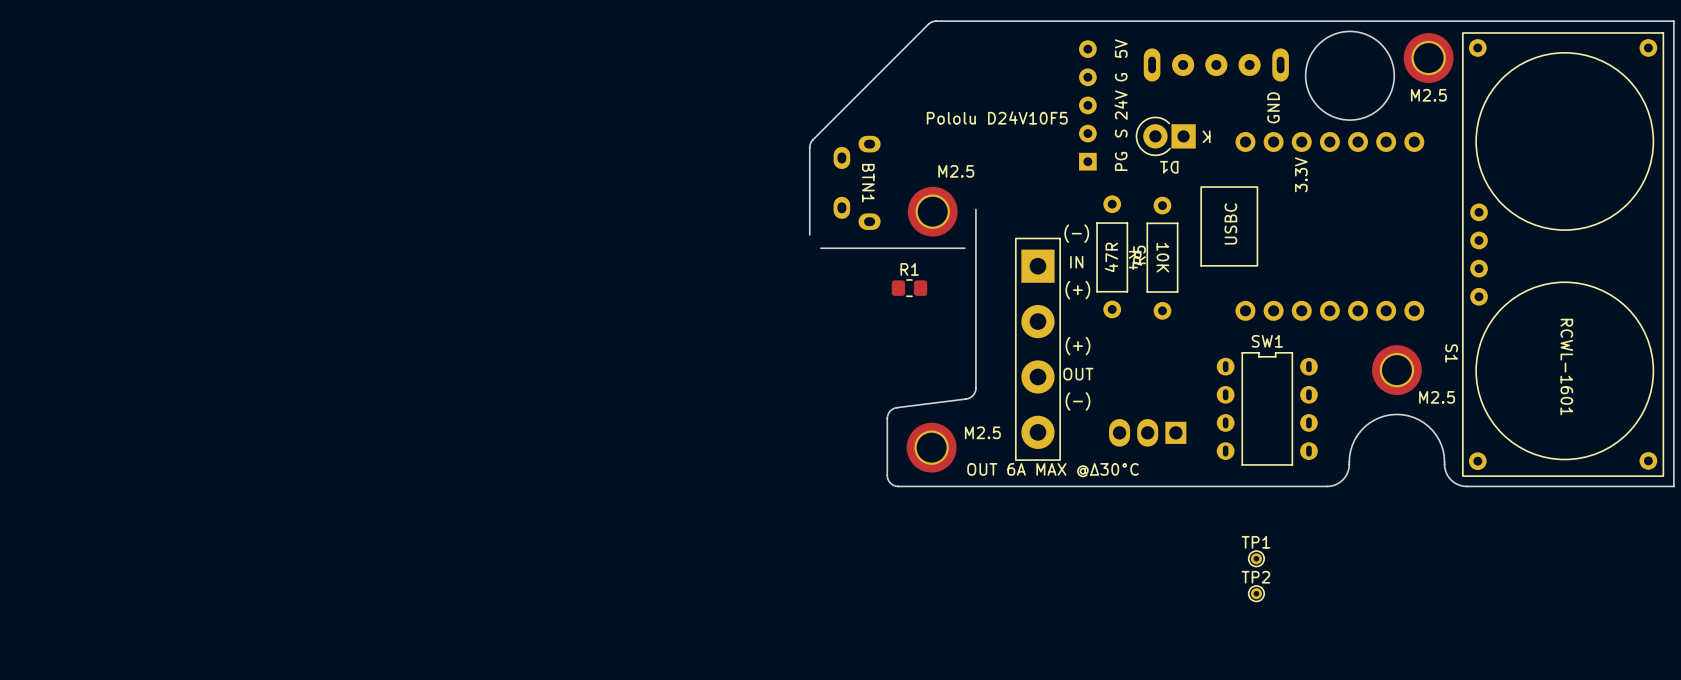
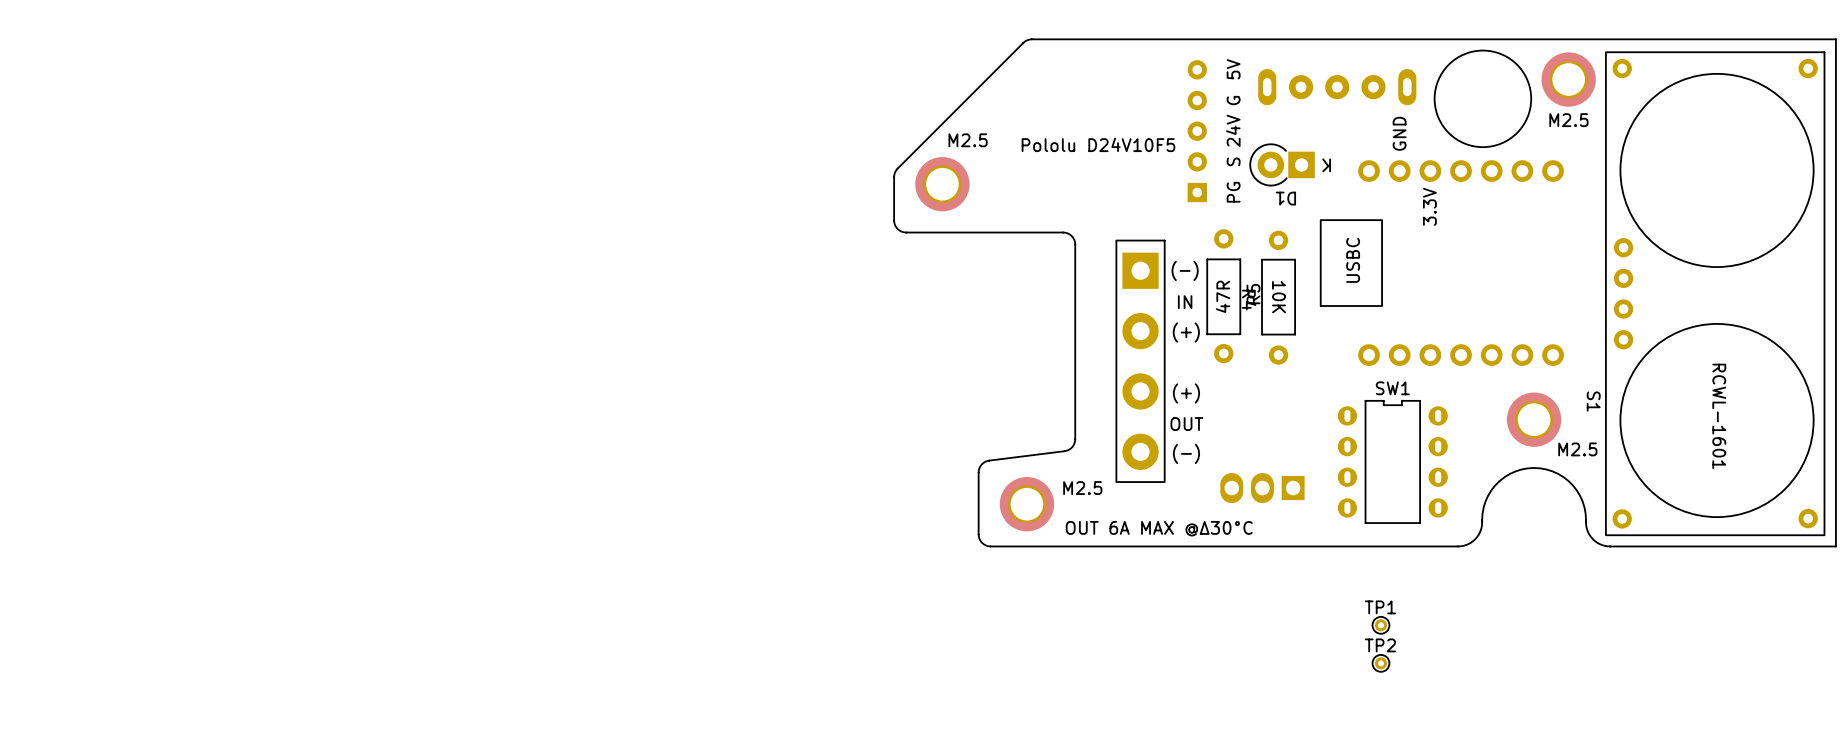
BTN1: (857, 182) -> none
board edge: (809, 187) (809, 234) -> (894, 220) (897, 228) (904, 232) (1064, 232) (1072, 237) (1075, 244)
M2.5 position: (932, 211) -> (942, 184)
board edge: (820, 248) (964, 248) -> none
R1: (909, 288) -> none
part position: (1037, 349) -> (1140, 361)

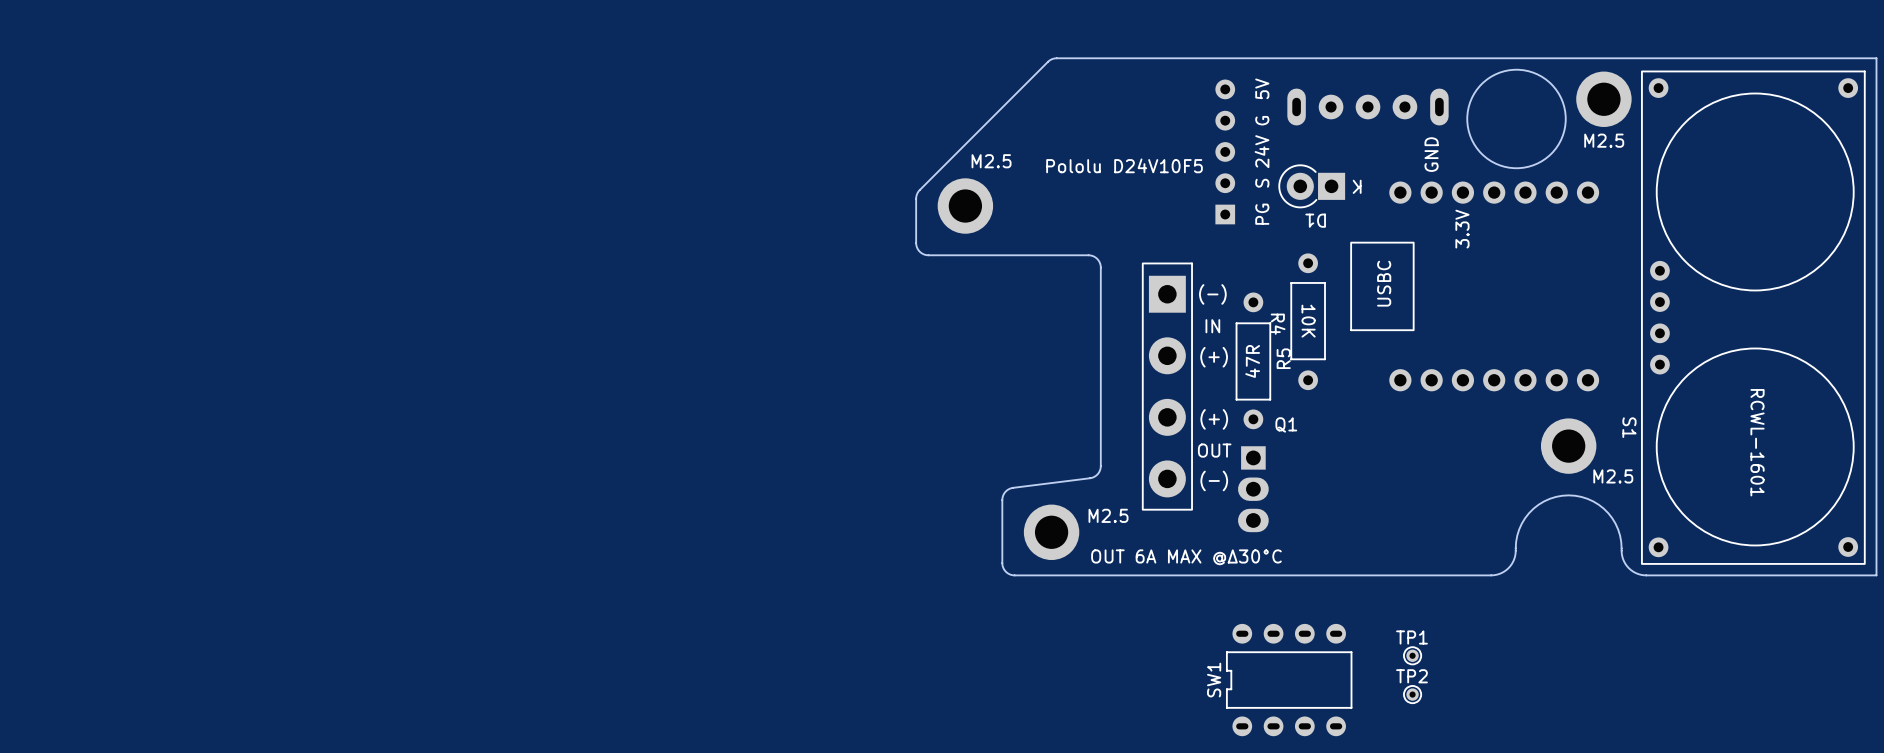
R5 position: (1223, 296) -> (1253, 360)
SW1 rotation: 0° (1392, 461) -> 90° counterclockwise (1289, 680)
SW1 position: (1392, 461) -> (1289, 680)
Q1 side: bottom (1262, 488) -> top (1253, 489)

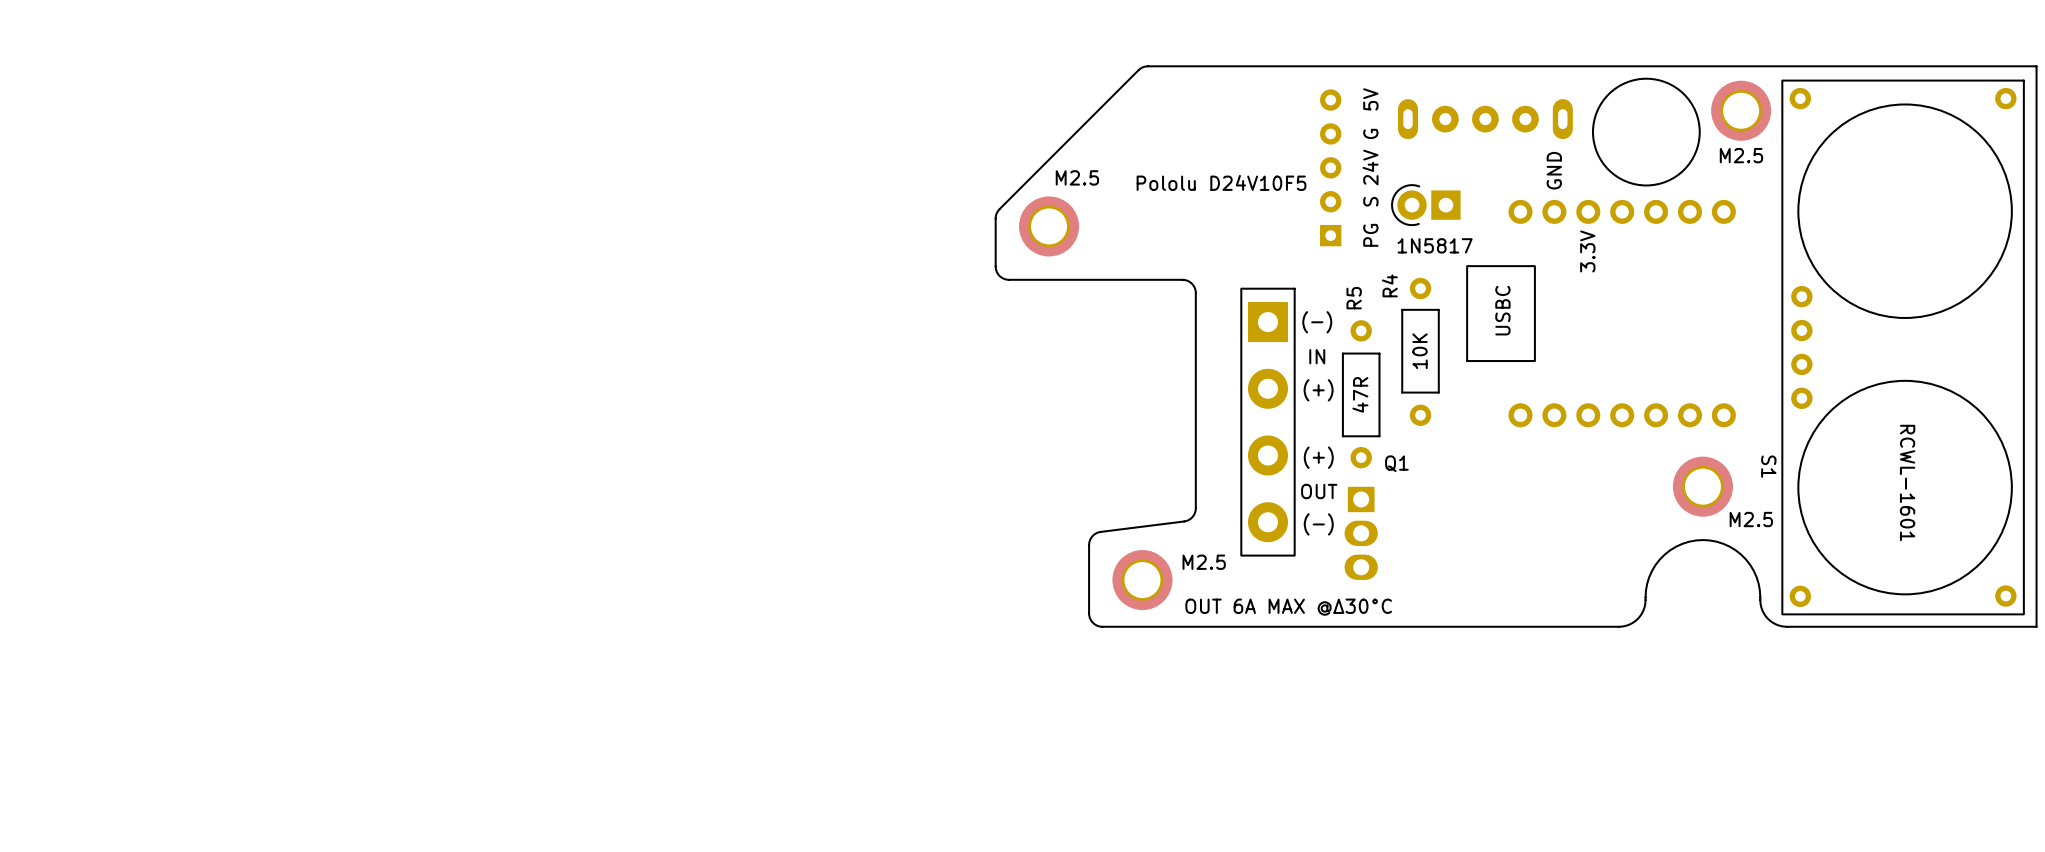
D1: (1311, 186) -> none
part: none -> 1N5817 (1425, 205)
R4 value rotation: 0° (1308, 321) -> 180° (1420, 351)
R4 name rotation: 0° (1278, 324) -> 180° (1389, 285)
R4 name position: R4 (1278, 324) -> R4 (1389, 285)
R5 name position: R5 (1283, 358) -> R5 (1354, 298)
TP1: (1412, 655) -> none
SW1: (1289, 680) -> none
TP2: (1412, 694) -> none

